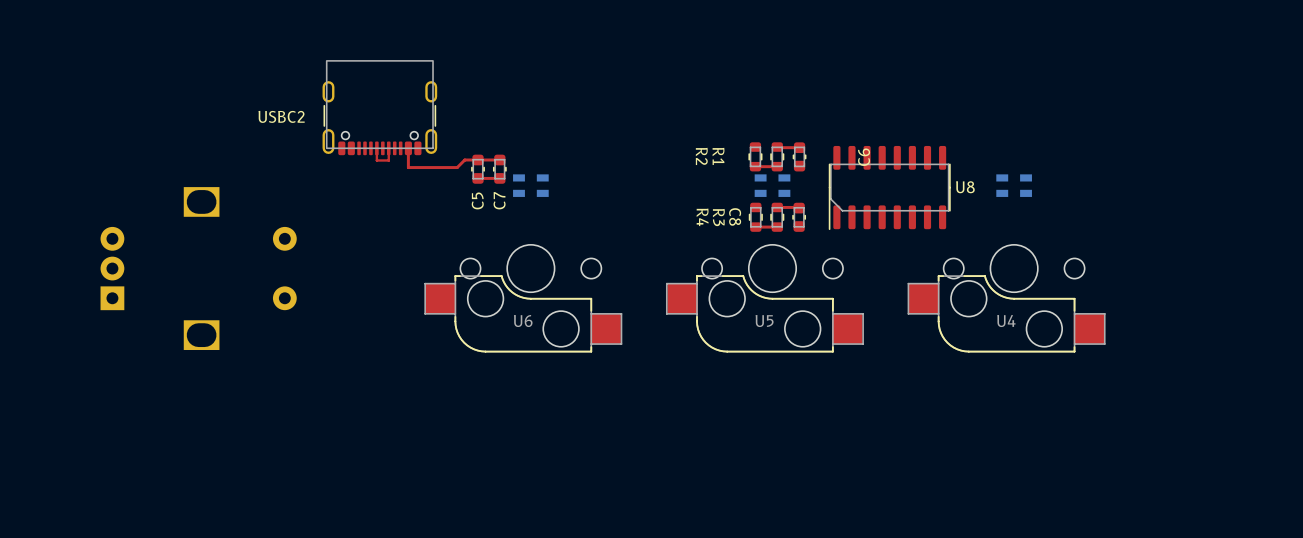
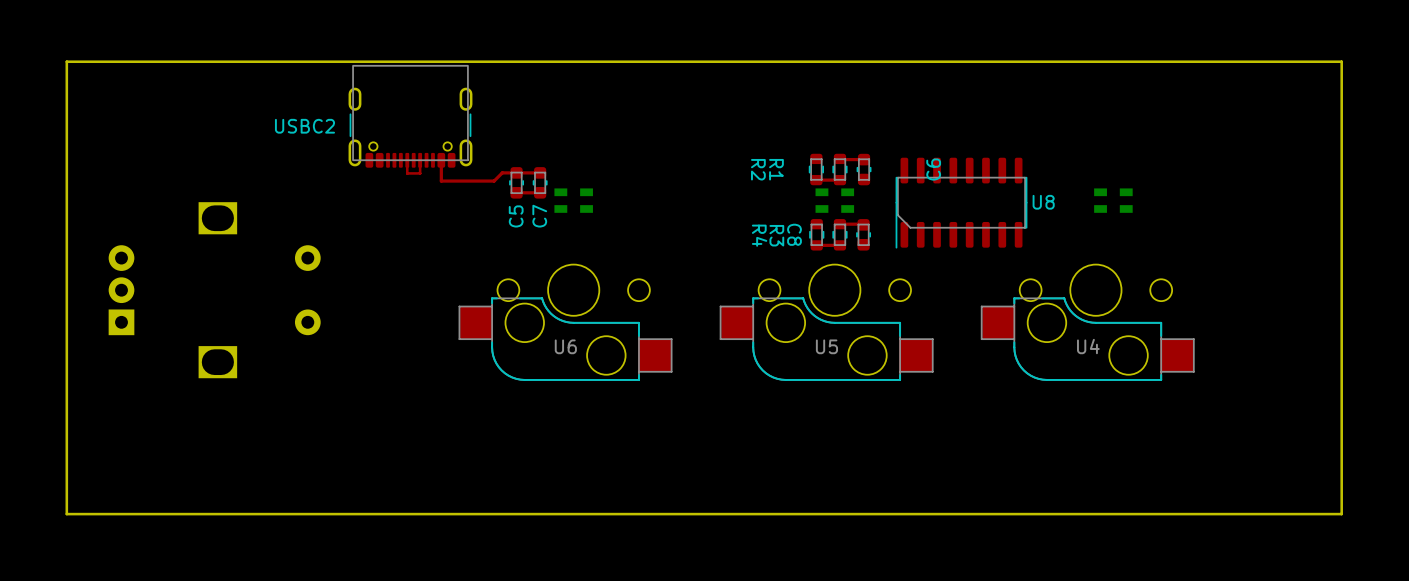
board edge: none -> (66, 61) (1341, 61) (1341, 514) (66, 514) (66, 61)
part position: (1014, 185) -> (1113, 200)

